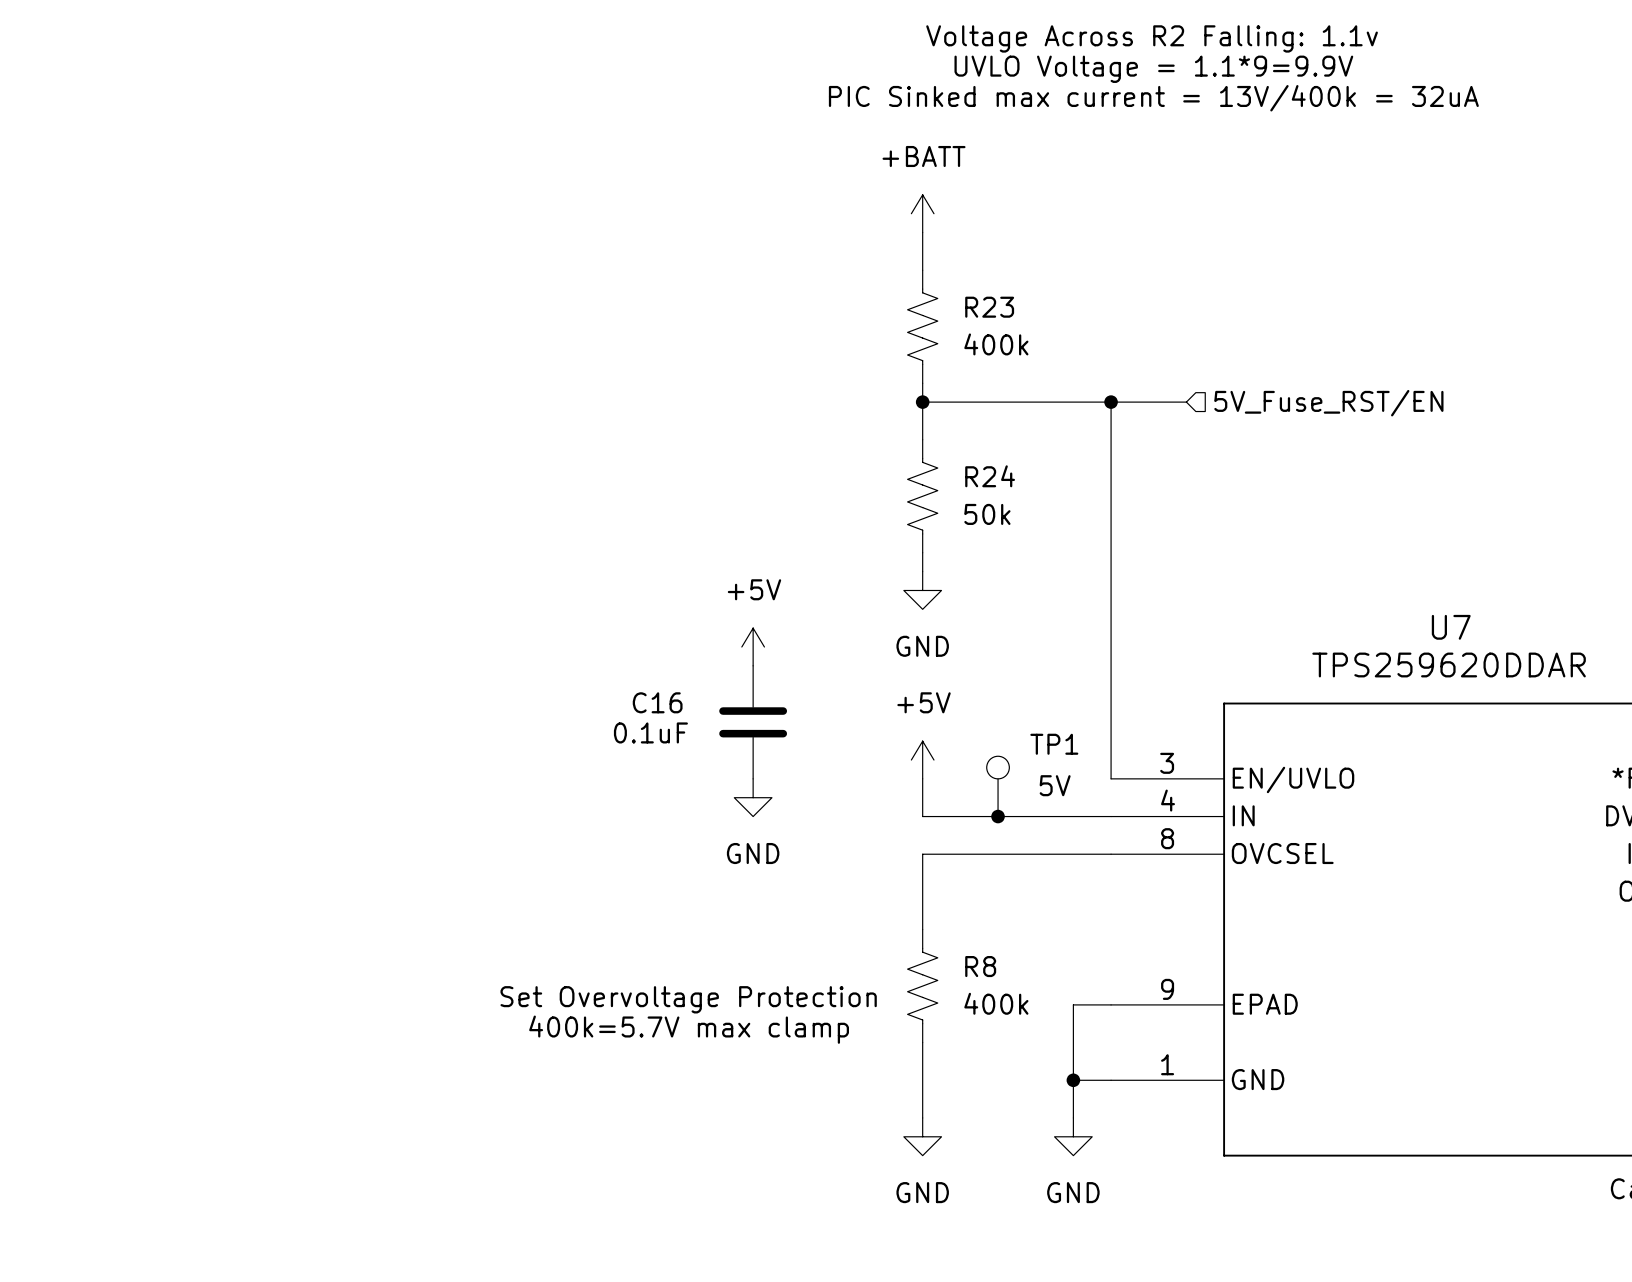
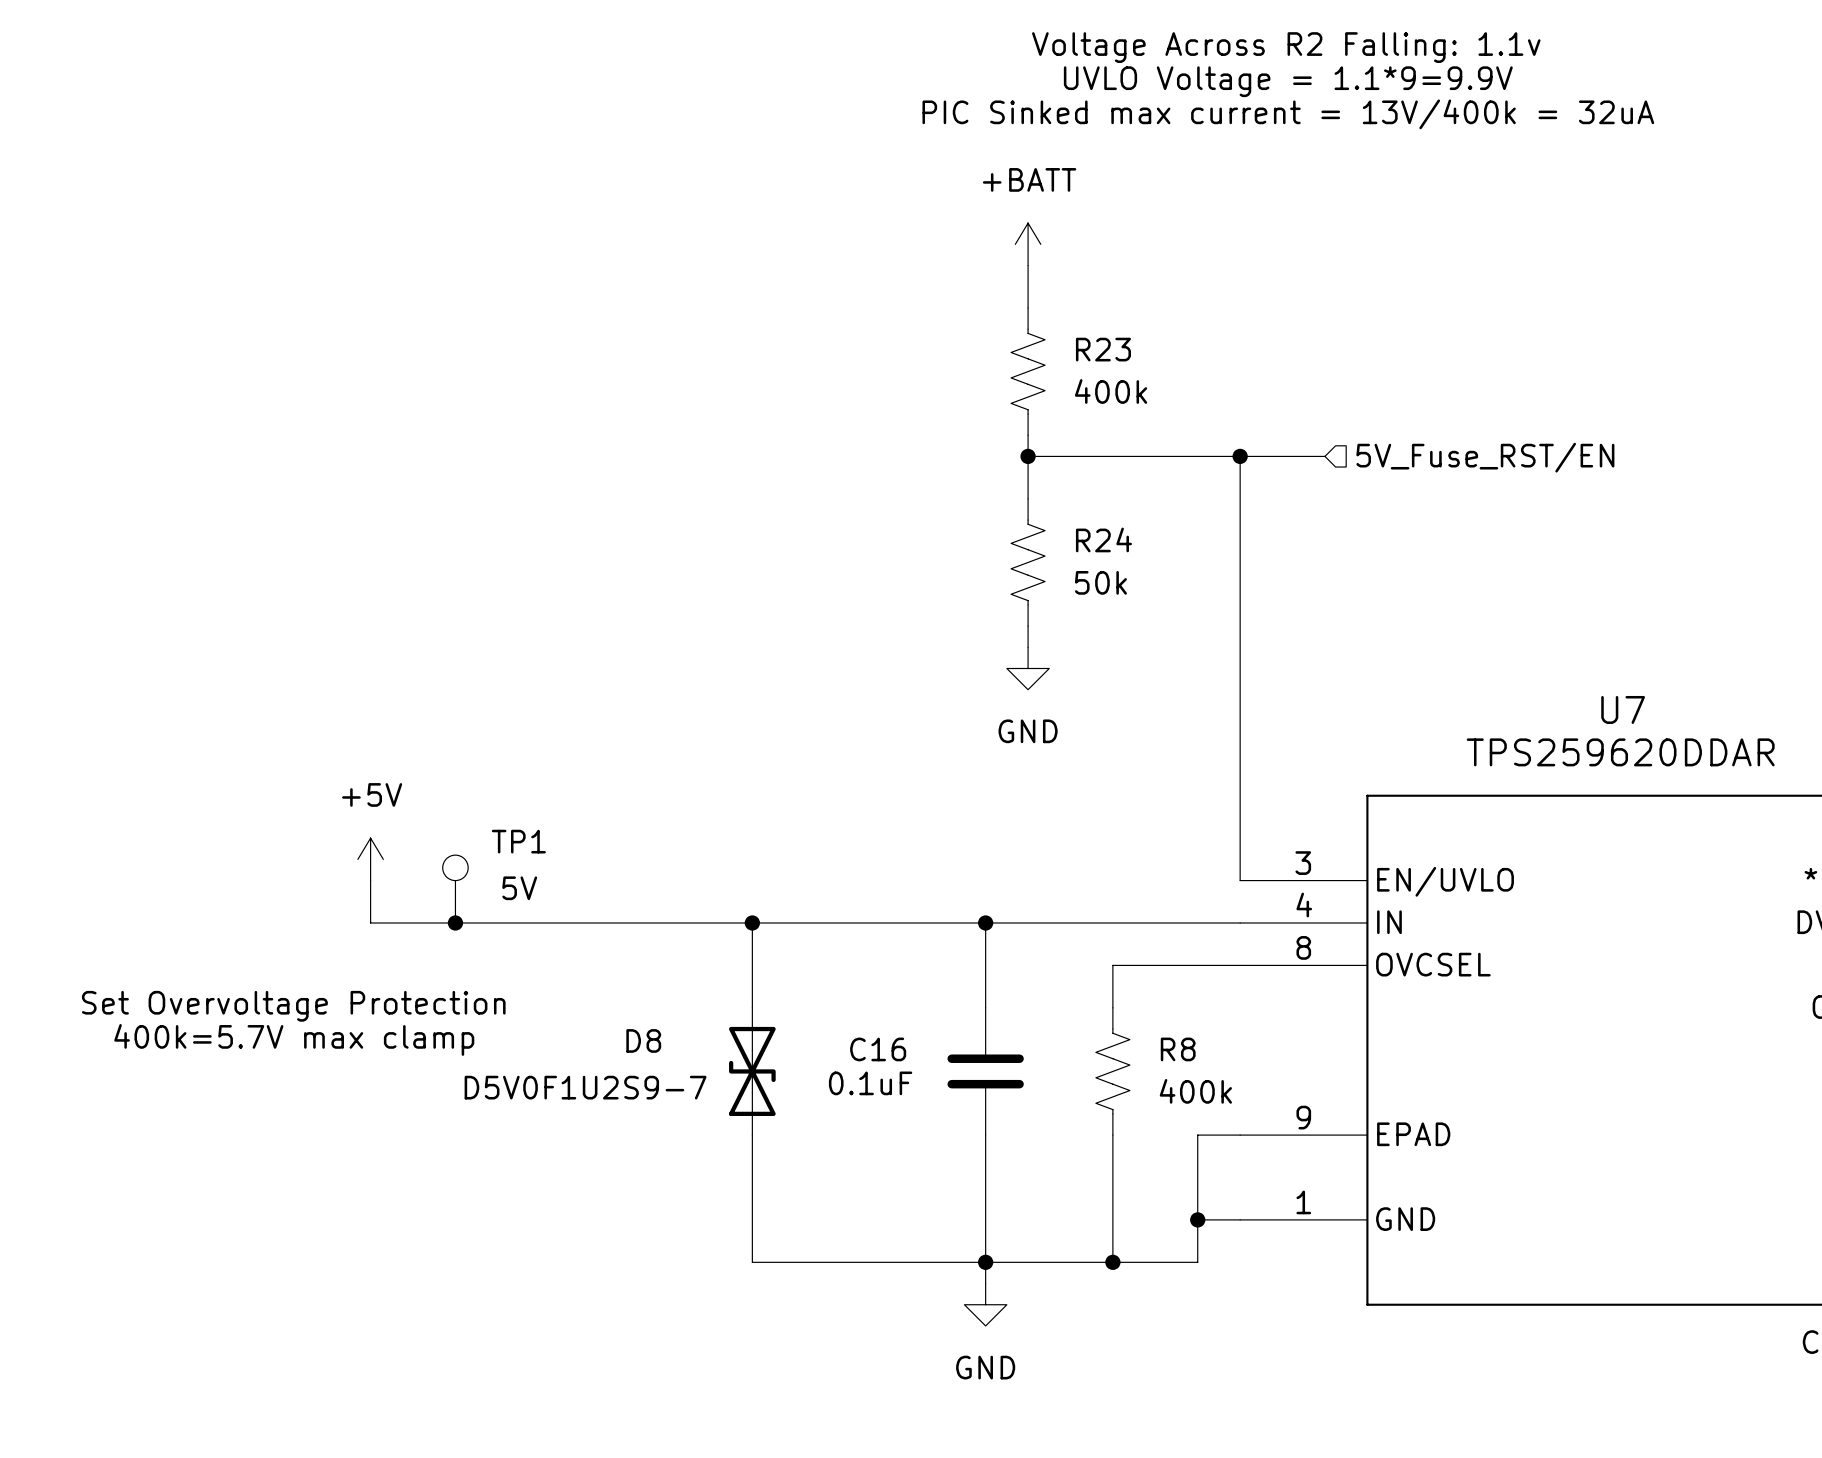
power symbol: +5V (753, 647) -> none
C16 position: (753, 722) -> (985, 1071)
power symbol: none -> +5V (370, 859)
power symbol: +5V (922, 760) -> none
wire: (922, 778) (922, 816) -> (370, 880) (370, 922) (1028, 922)
TP1 position: (998, 786) -> (455, 889)
power symbol: GND (753, 797) -> none
junction: none -> (455, 922)
wire: none -> (752, 922) (752, 1007)
junction: none -> (752, 922)
junction: none -> (985, 922)
junction: (998, 816) -> none
wire: (998, 854) (922, 854) (922, 929) -> (1112, 965) (1112, 1007)
text: none -> Set Overvoltage Protection (293, 1006)
text: none -> 400k=5.7V max clamp (294, 1039)
D8: none -> D5V0F1U2S9-7 (752, 1071)
R8 position: (922, 986) -> (1112, 1071)
text: Set Overvoltage Protection (688, 999) -> none
wire: none -> (752, 1135) (752, 1262) (1197, 1262)
wire: none -> (985, 1135) (985, 1283)
wire: none -> (1112, 1135) (1112, 1262)
text: 400k=5.7V max clamp (689, 1029) -> none
wire: (922, 1042) (922, 1117) -> (985, 922) (985, 1007)
junction: none -> (985, 1262)
junction: none -> (1112, 1262)
power symbol position: GND (922, 1136) -> GND (985, 1304)
power symbol: GND (1073, 1136) -> none

